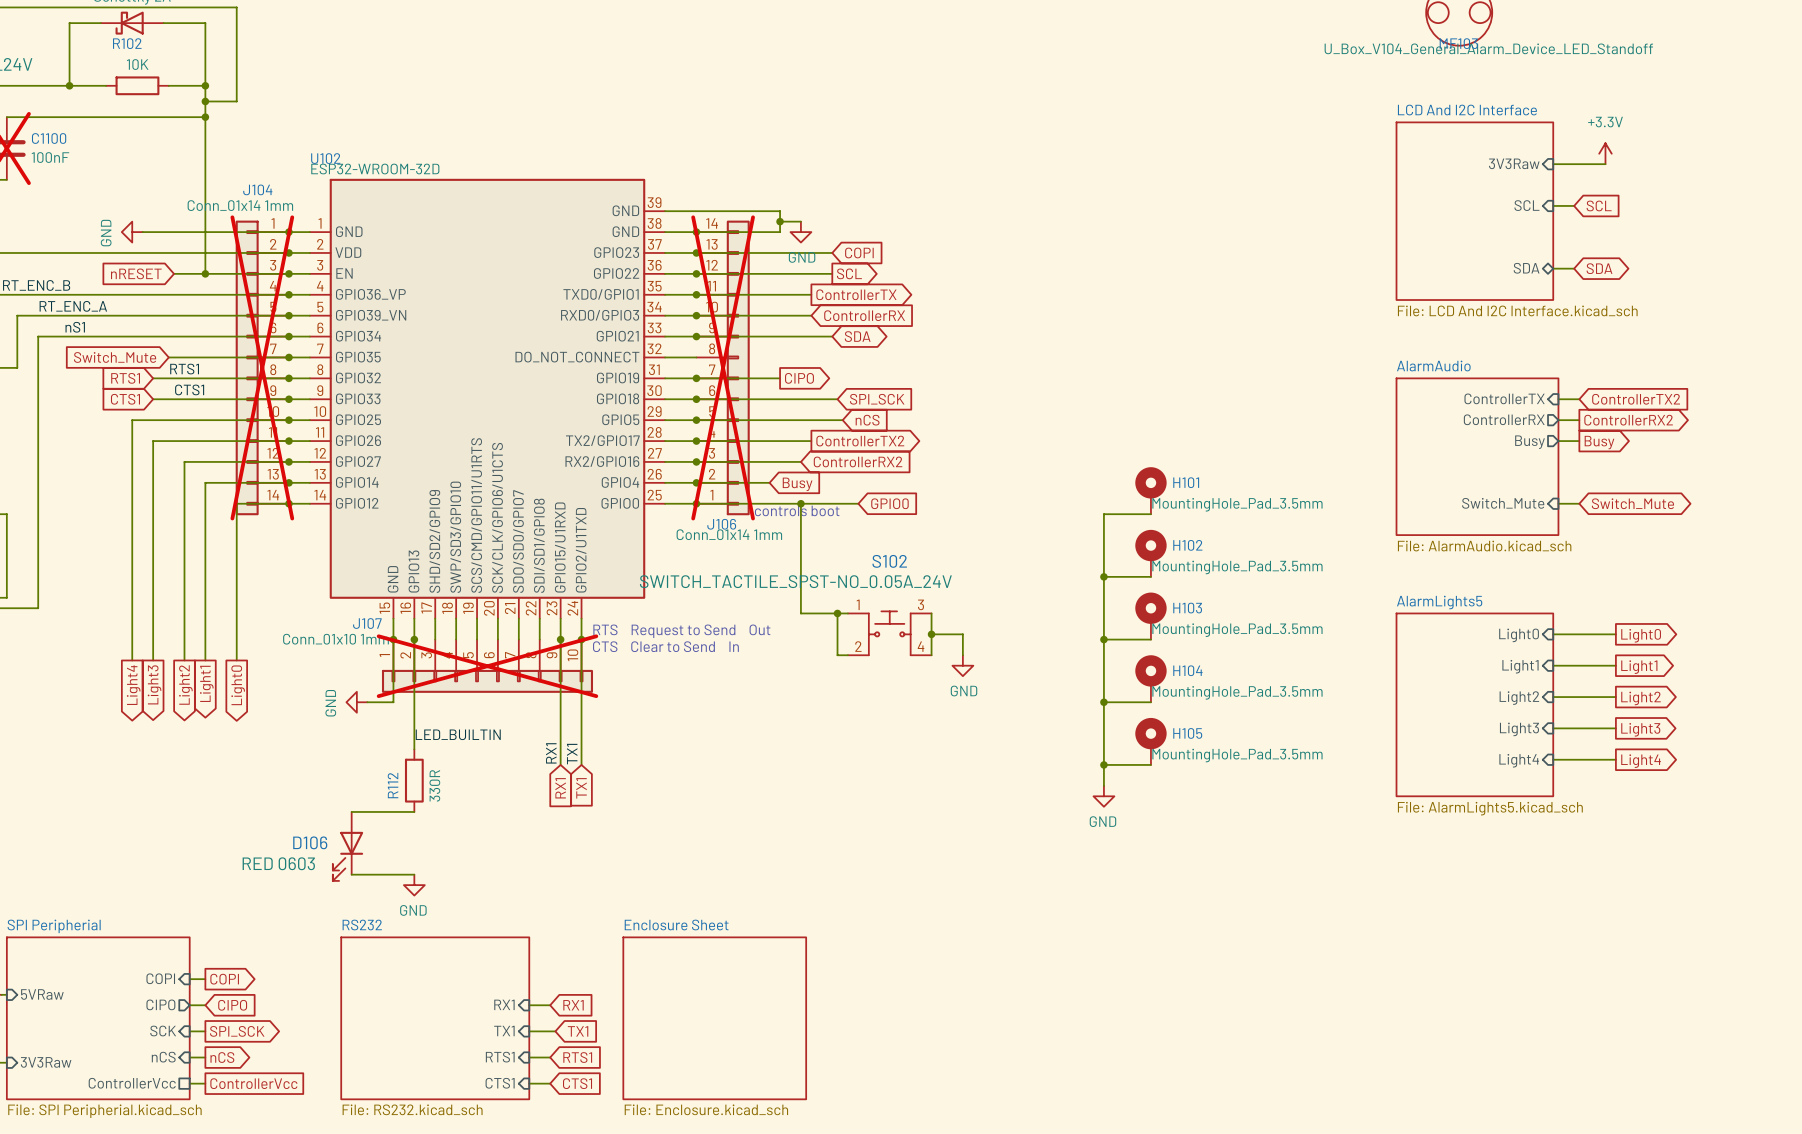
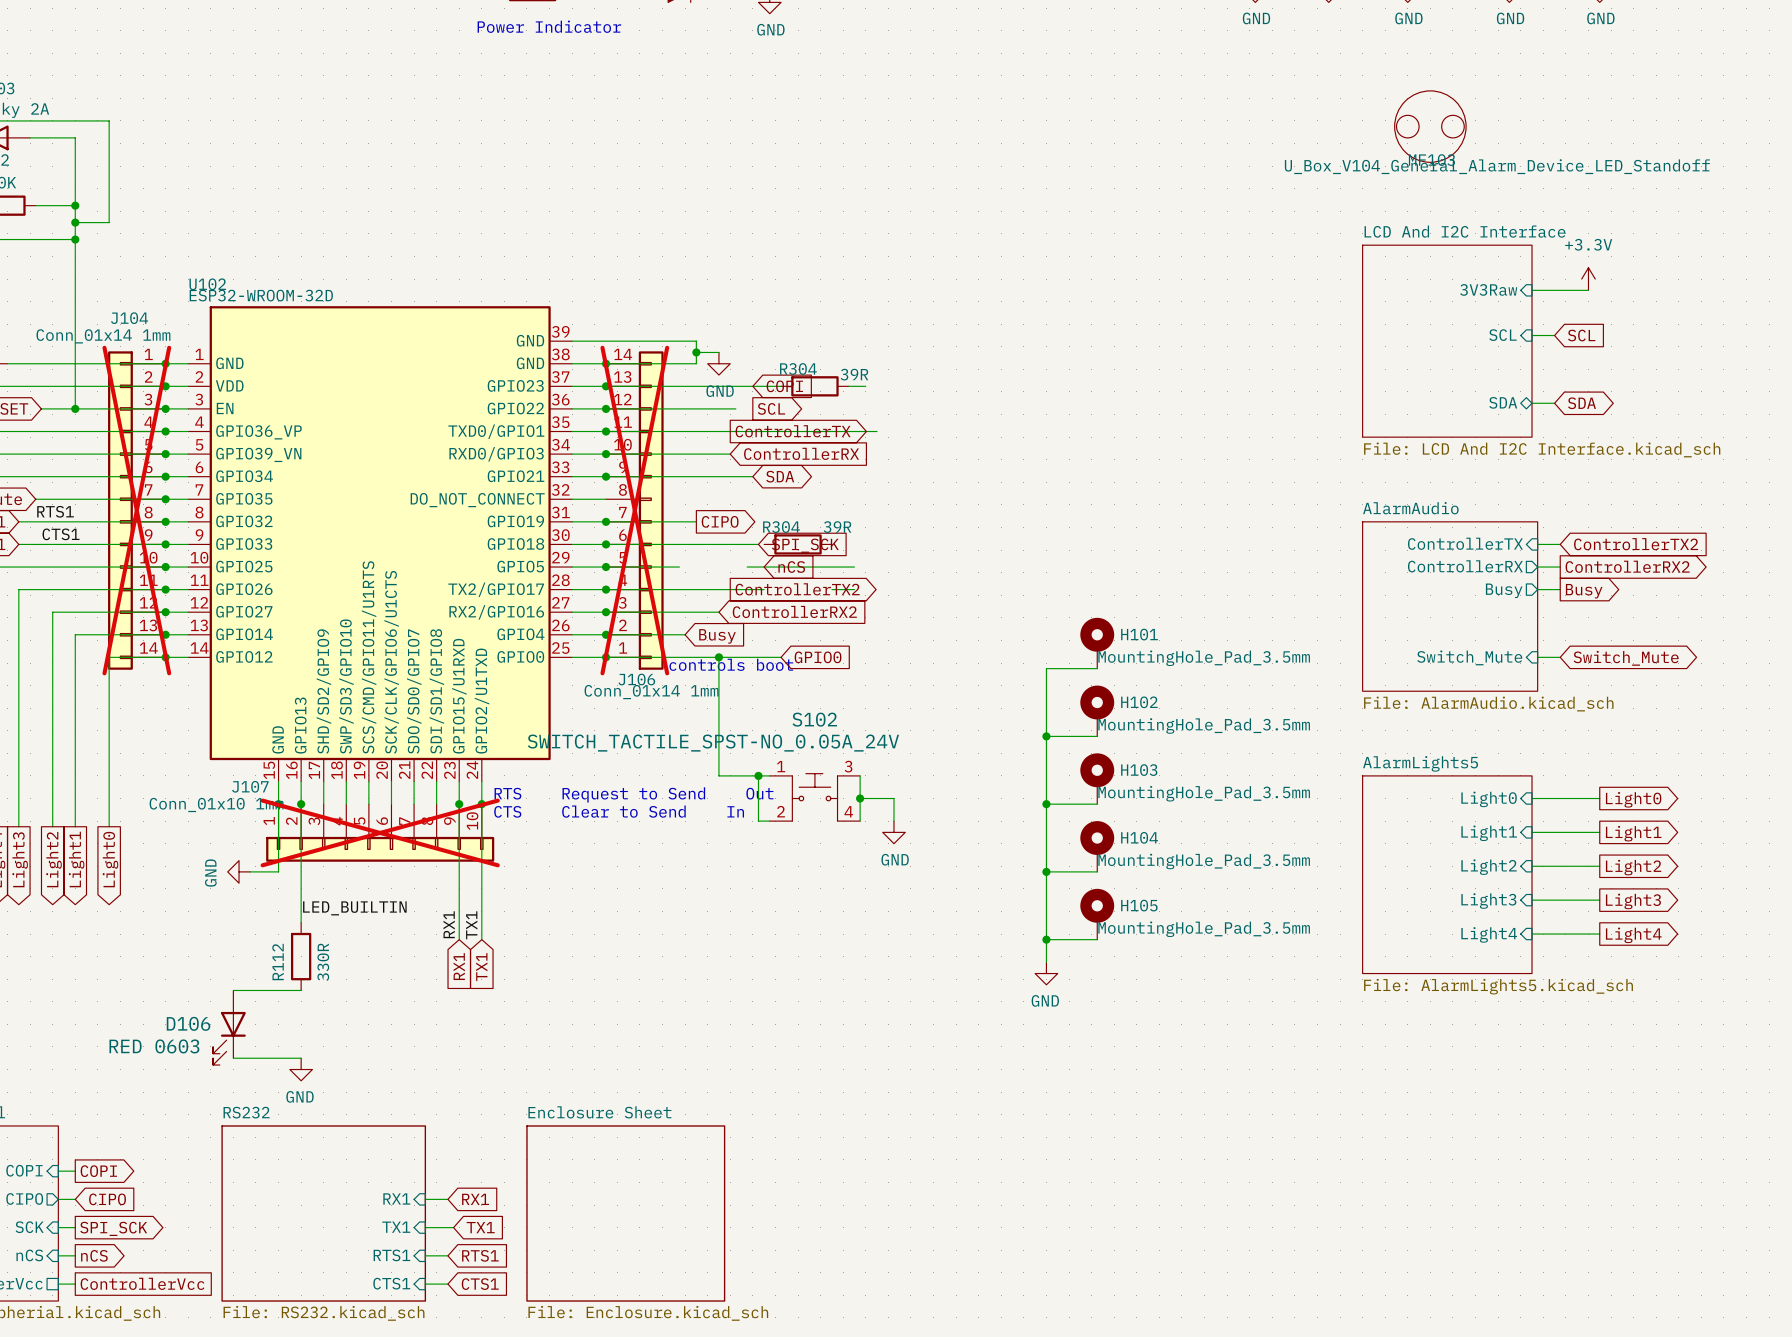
wire: none -> (752, 386) (781, 386)
R304: none -> 39R (814, 386)
wire: (816, 273) (832, 273) -> (848, 386) (865, 386)
wire: none -> (730, 431) (877, 431)
R304: none -> 39R (798, 544)
wire: (764, 420) (827, 420) -> none
wire: none -> (764, 567) (854, 567)
wire: none -> (730, 589) (764, 589)
wire: none -> (831, 589) (854, 589)

